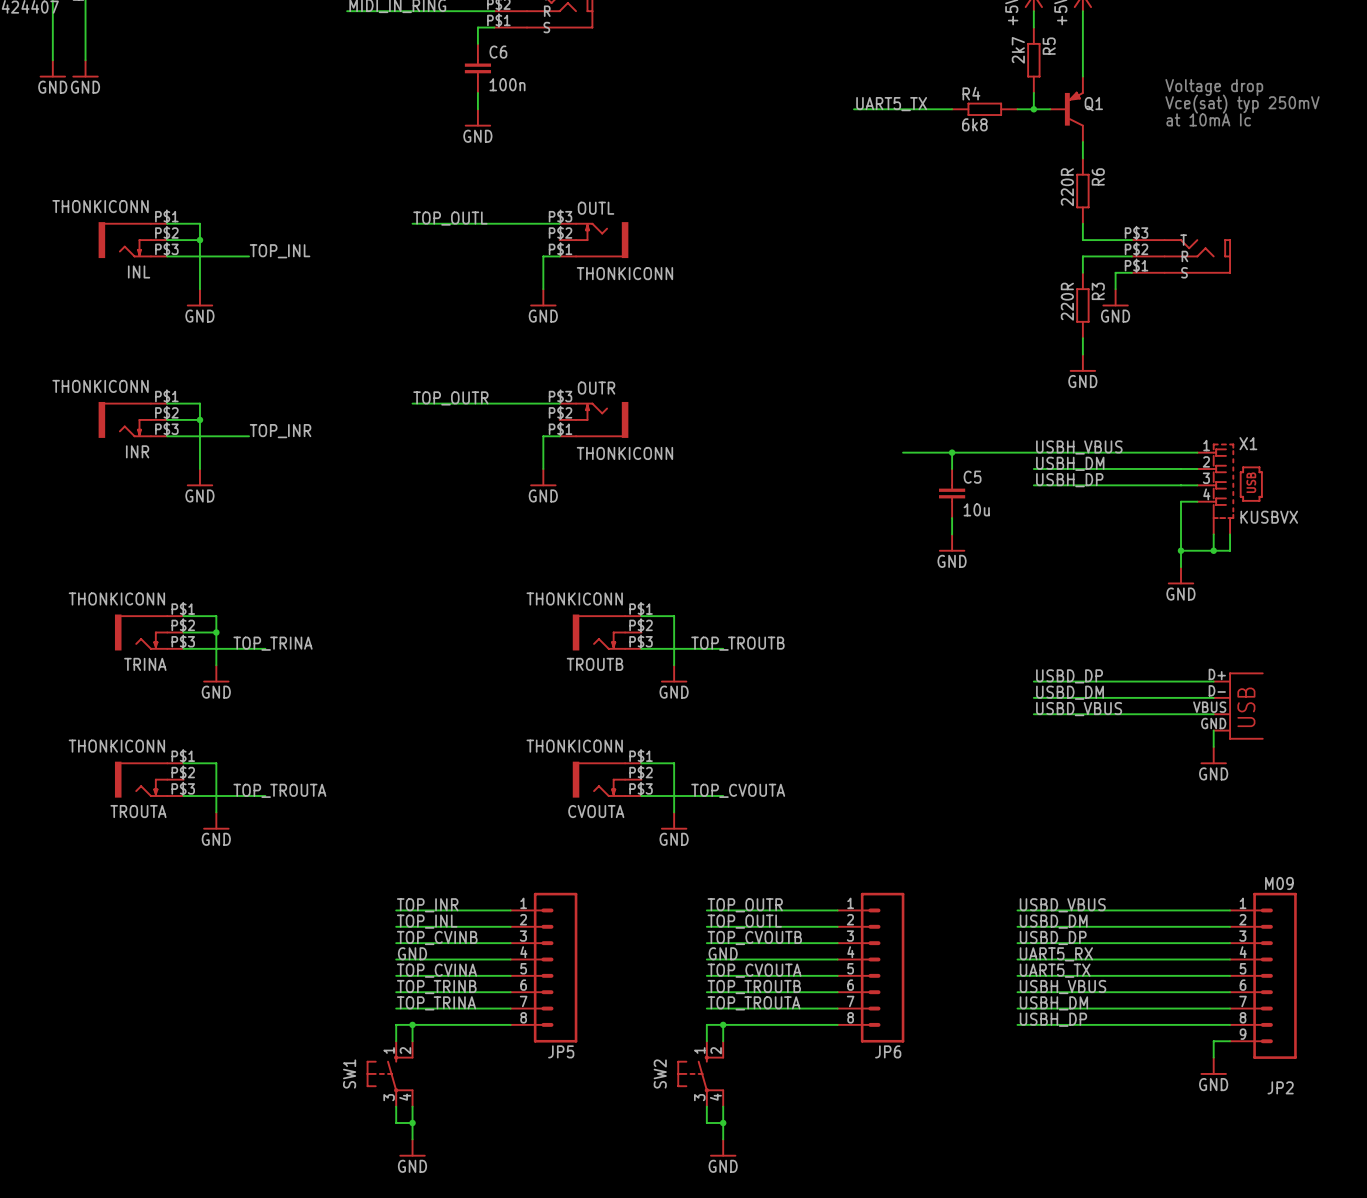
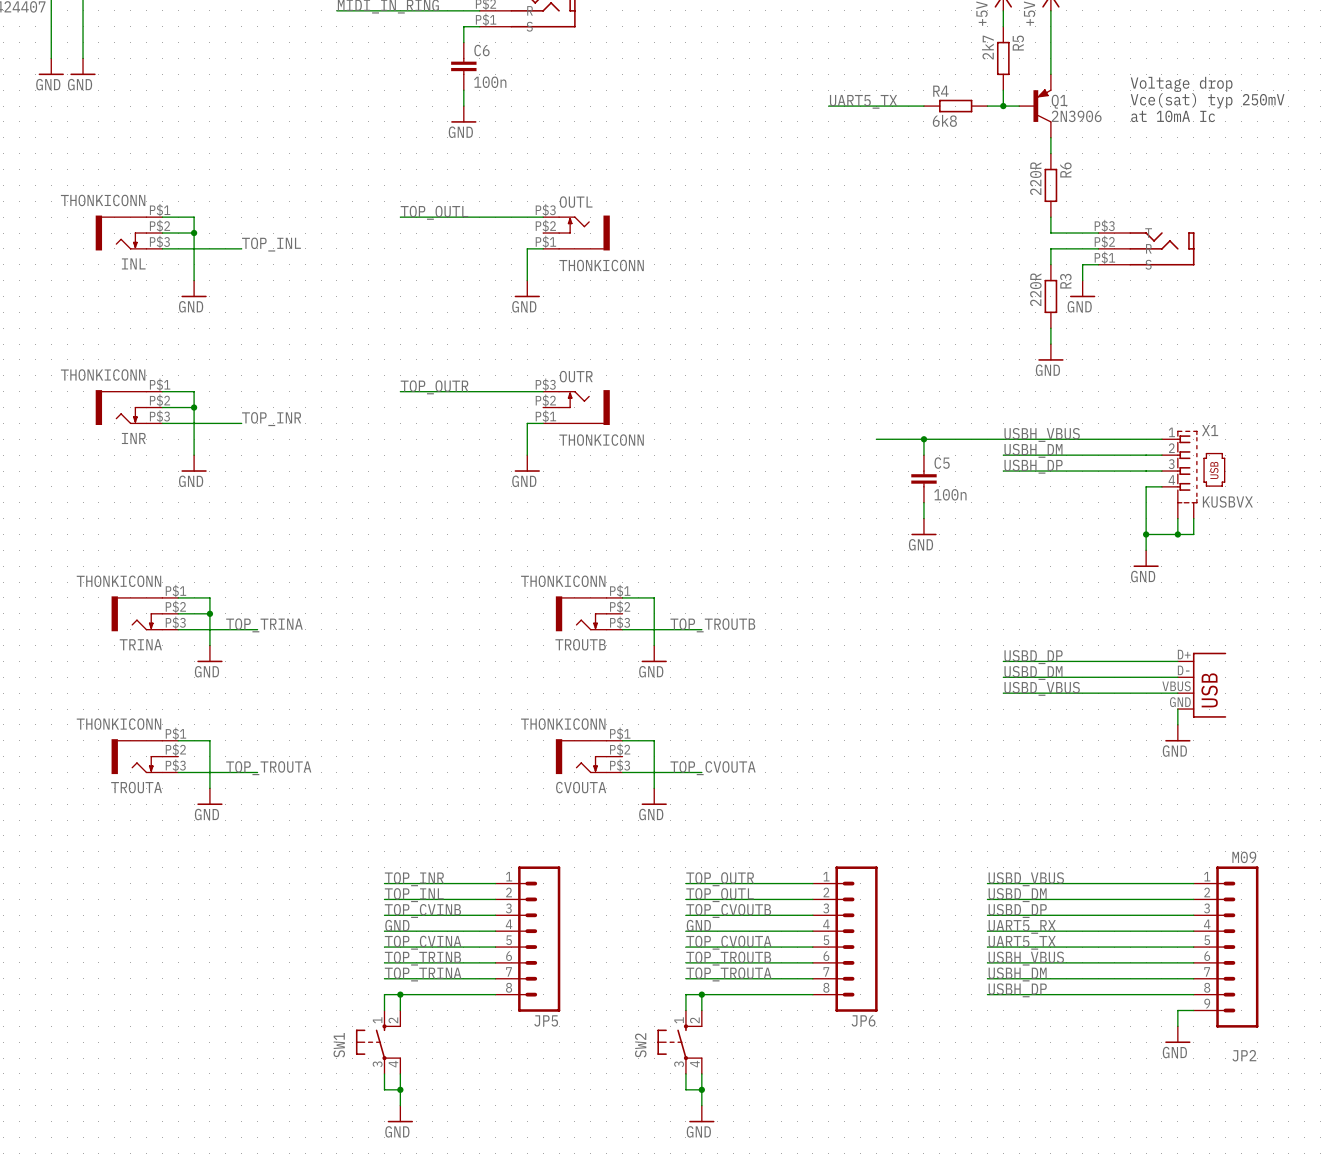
Q1 value: none -> 2N3906 (1076, 116)
C5 value: 10u (976, 509) -> 100n (950, 494)

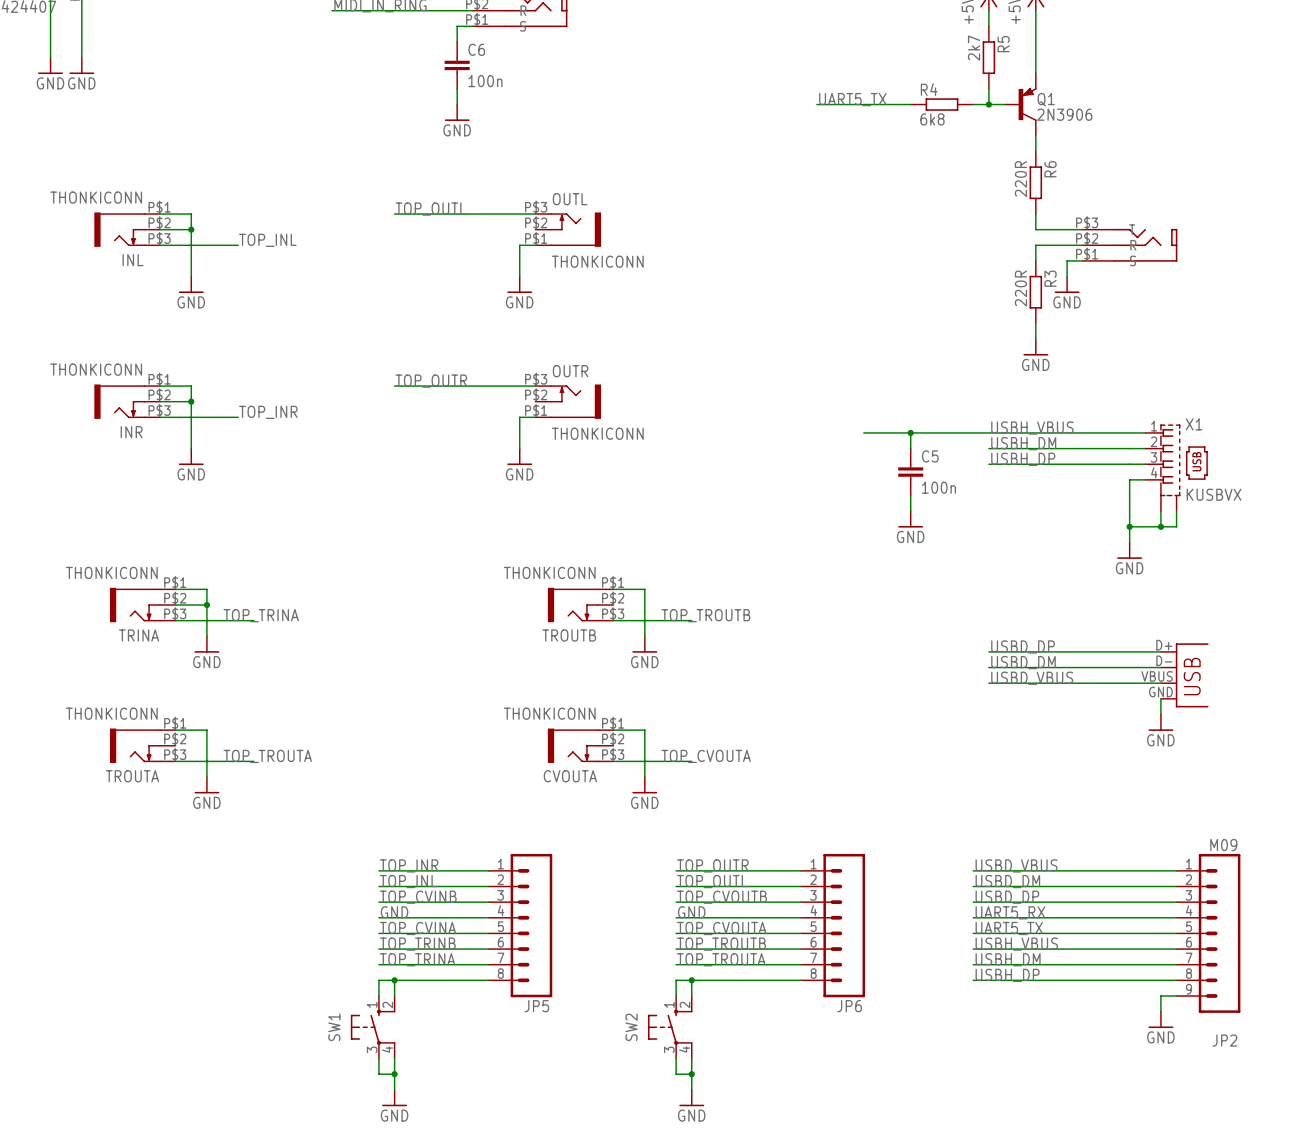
text: Voltage drop (1181, 84) -> none
text: Vce(sat) typ 250mV (1207, 100) -> none
text: at 10mA Ic (1173, 116) -> none

